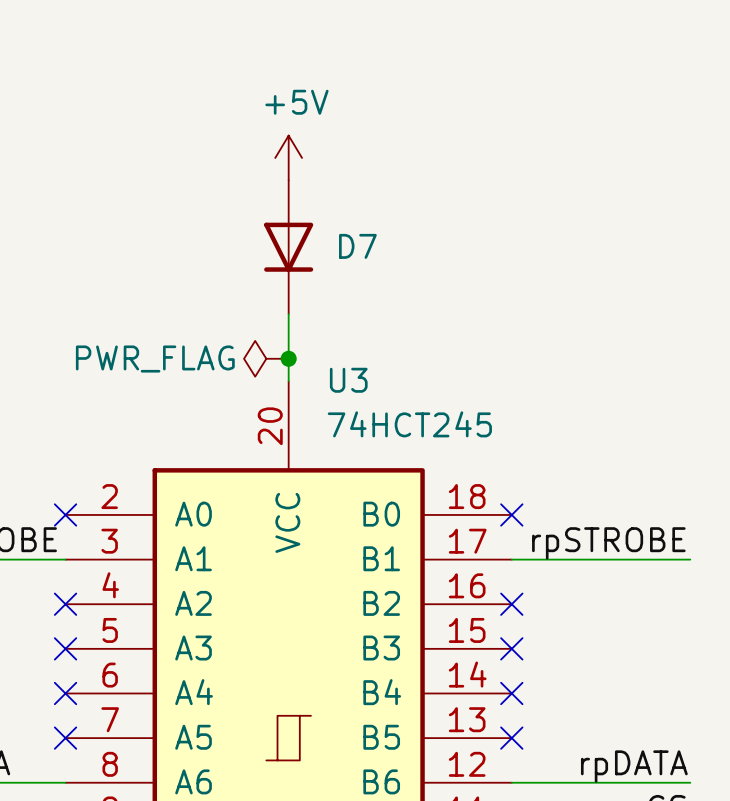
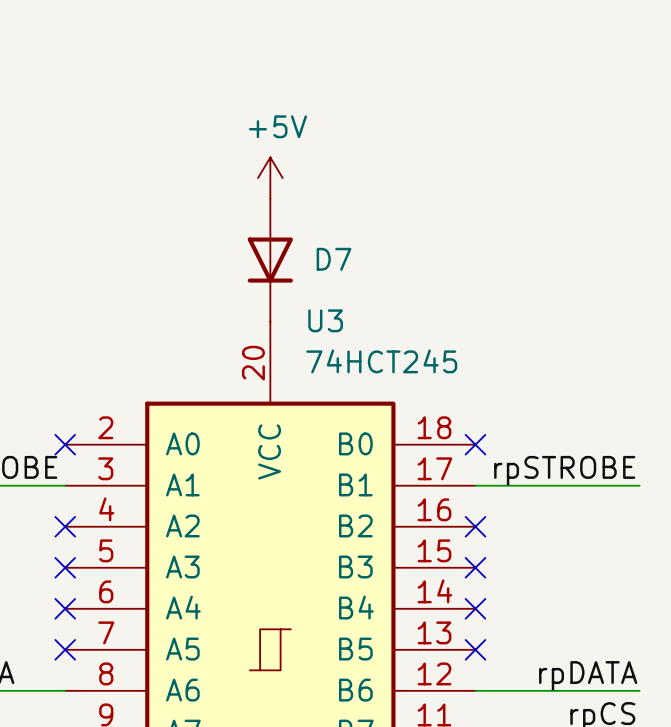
power symbol position: +5V (288, 157) -> +5V (270, 178)
D7 position: (288, 247) -> (270, 260)
power symbol: PWR_FLAG (266, 358) -> none
junction: (288, 358) -> none

